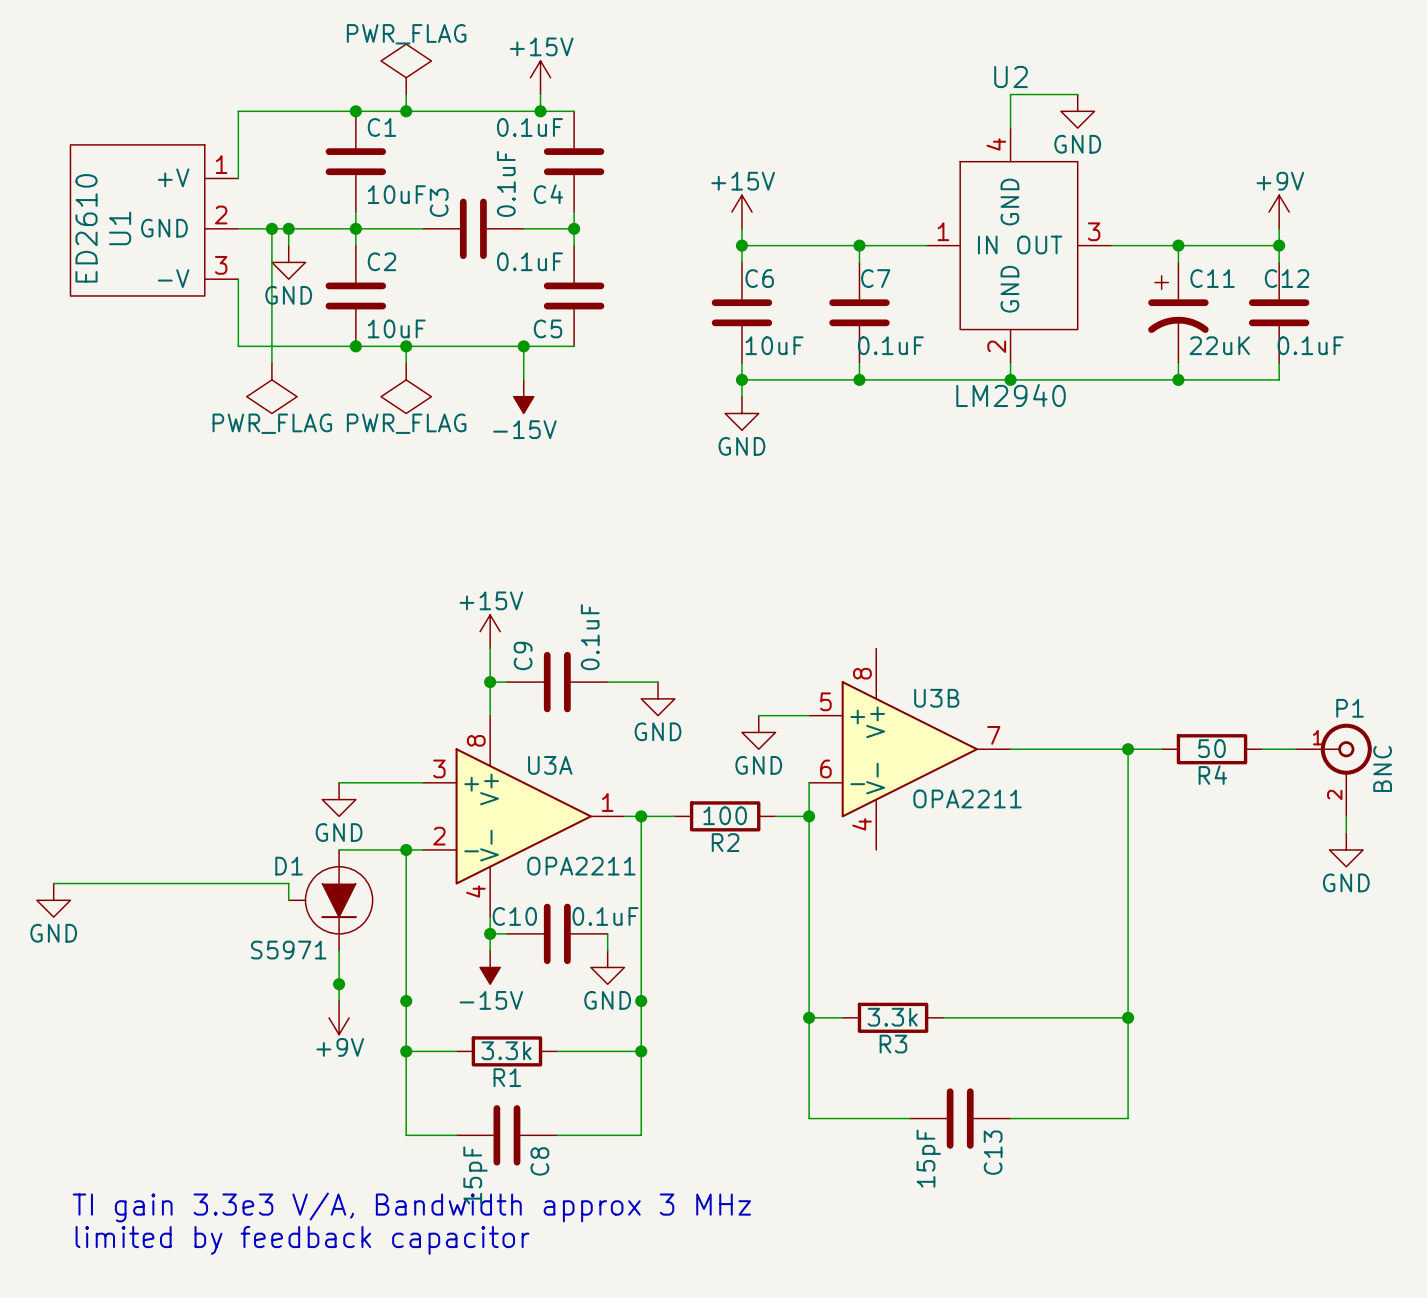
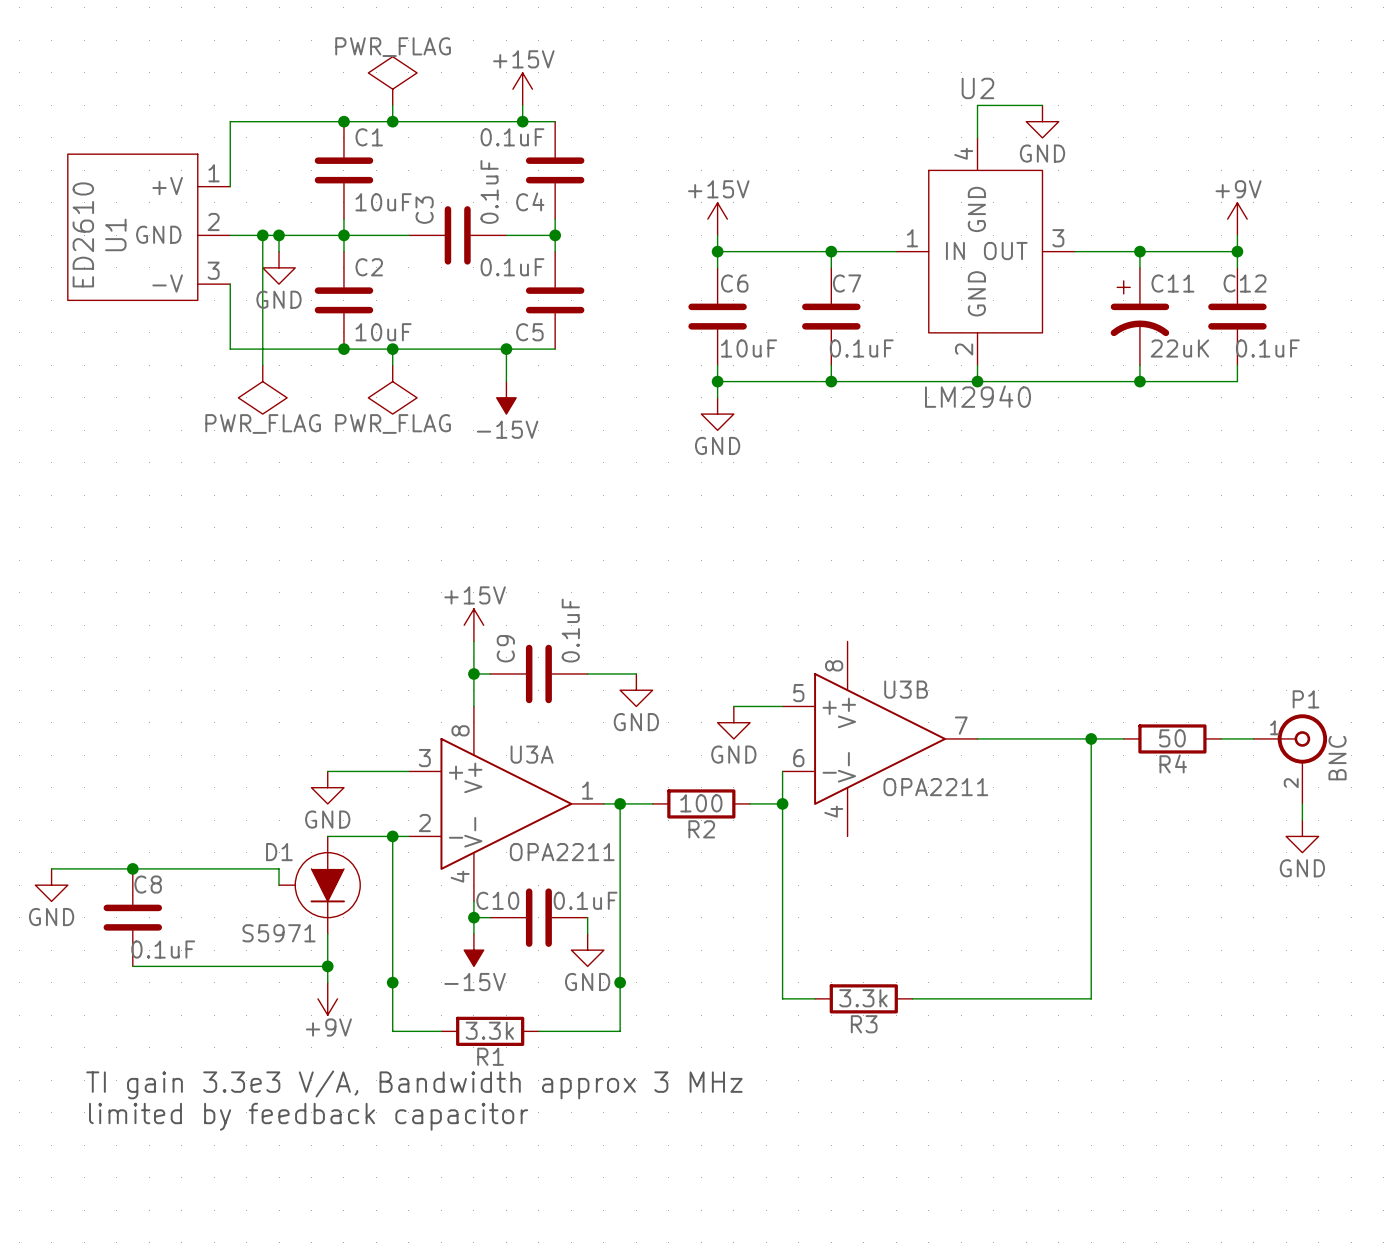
junction: none -> (132, 868)
wire: none -> (132, 966) (327, 966)
wire: (809, 1017) (809, 1118) (909, 1118) -> none
junction: (809, 1017) -> none
wire: (1128, 1017) (1128, 1118) (1010, 1118) -> none
junction: (1128, 1017) -> none
wire: (406, 1051) (406, 1135) (456, 1135) -> none
junction: (406, 1051) -> none
wire: (641, 1051) (641, 1135) (557, 1135) -> none
junction: (641, 1051) -> none
C13: 15pF (960, 1118) -> none
C8 rotation: 0° (506, 1135) -> 90° clockwise (132, 917)
C8 position: (506, 1135) -> (132, 917)
C8 name position: C8 (539, 1161) -> C8 (148, 884)
C8 value: 15pF (475, 1175) -> 0.1uF (163, 949)
text position: TI gain 3.3e3 V/A, Bandwidth approx 3 MHz (411, 1207) -> TI gain 3.3e3 V/A, Bandwidth approx 3 MHz (414, 1084)
text position: limited by feedback capacitor (302, 1240) -> limited by feedback capacitor (308, 1116)

